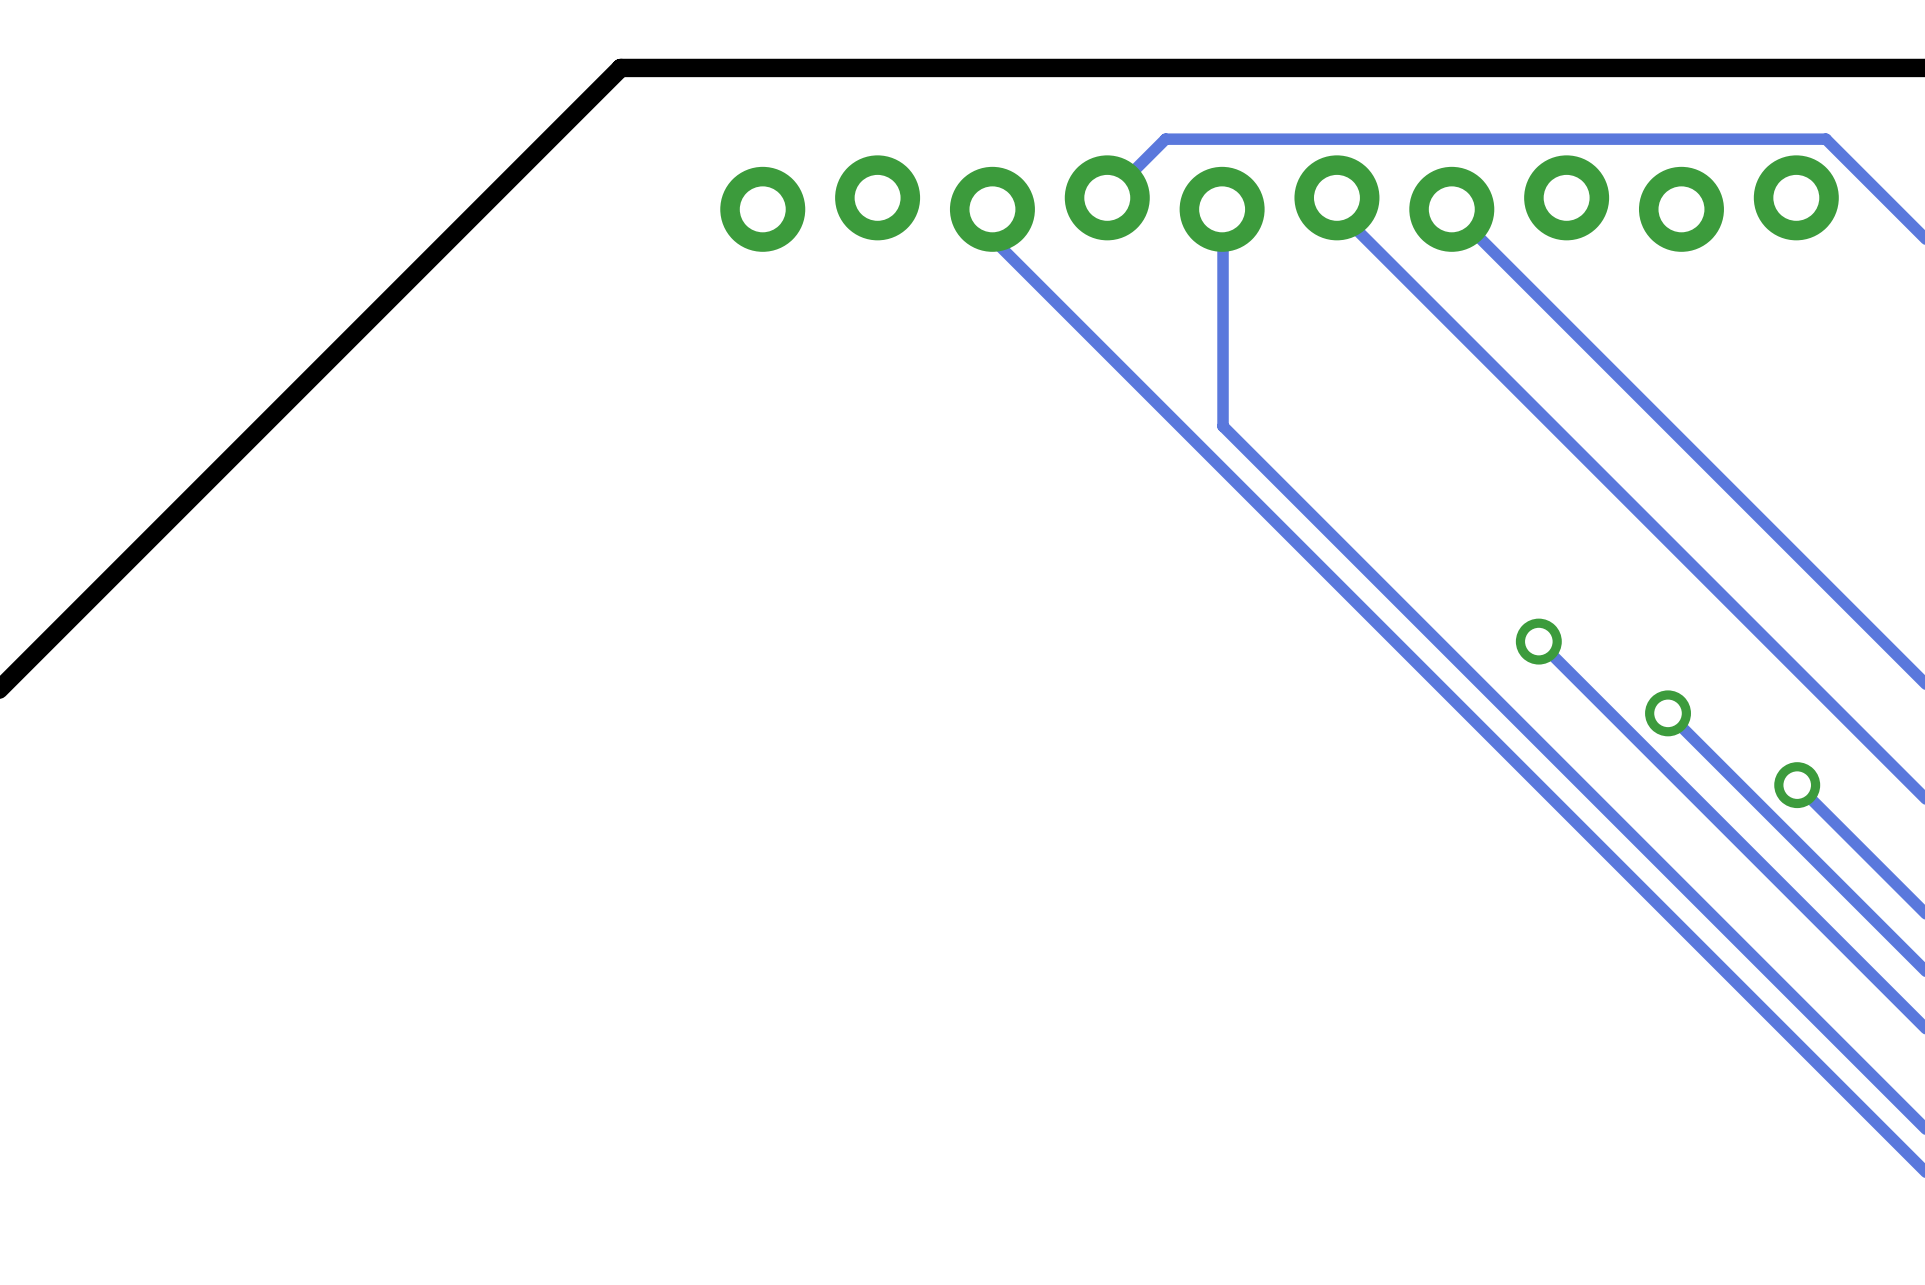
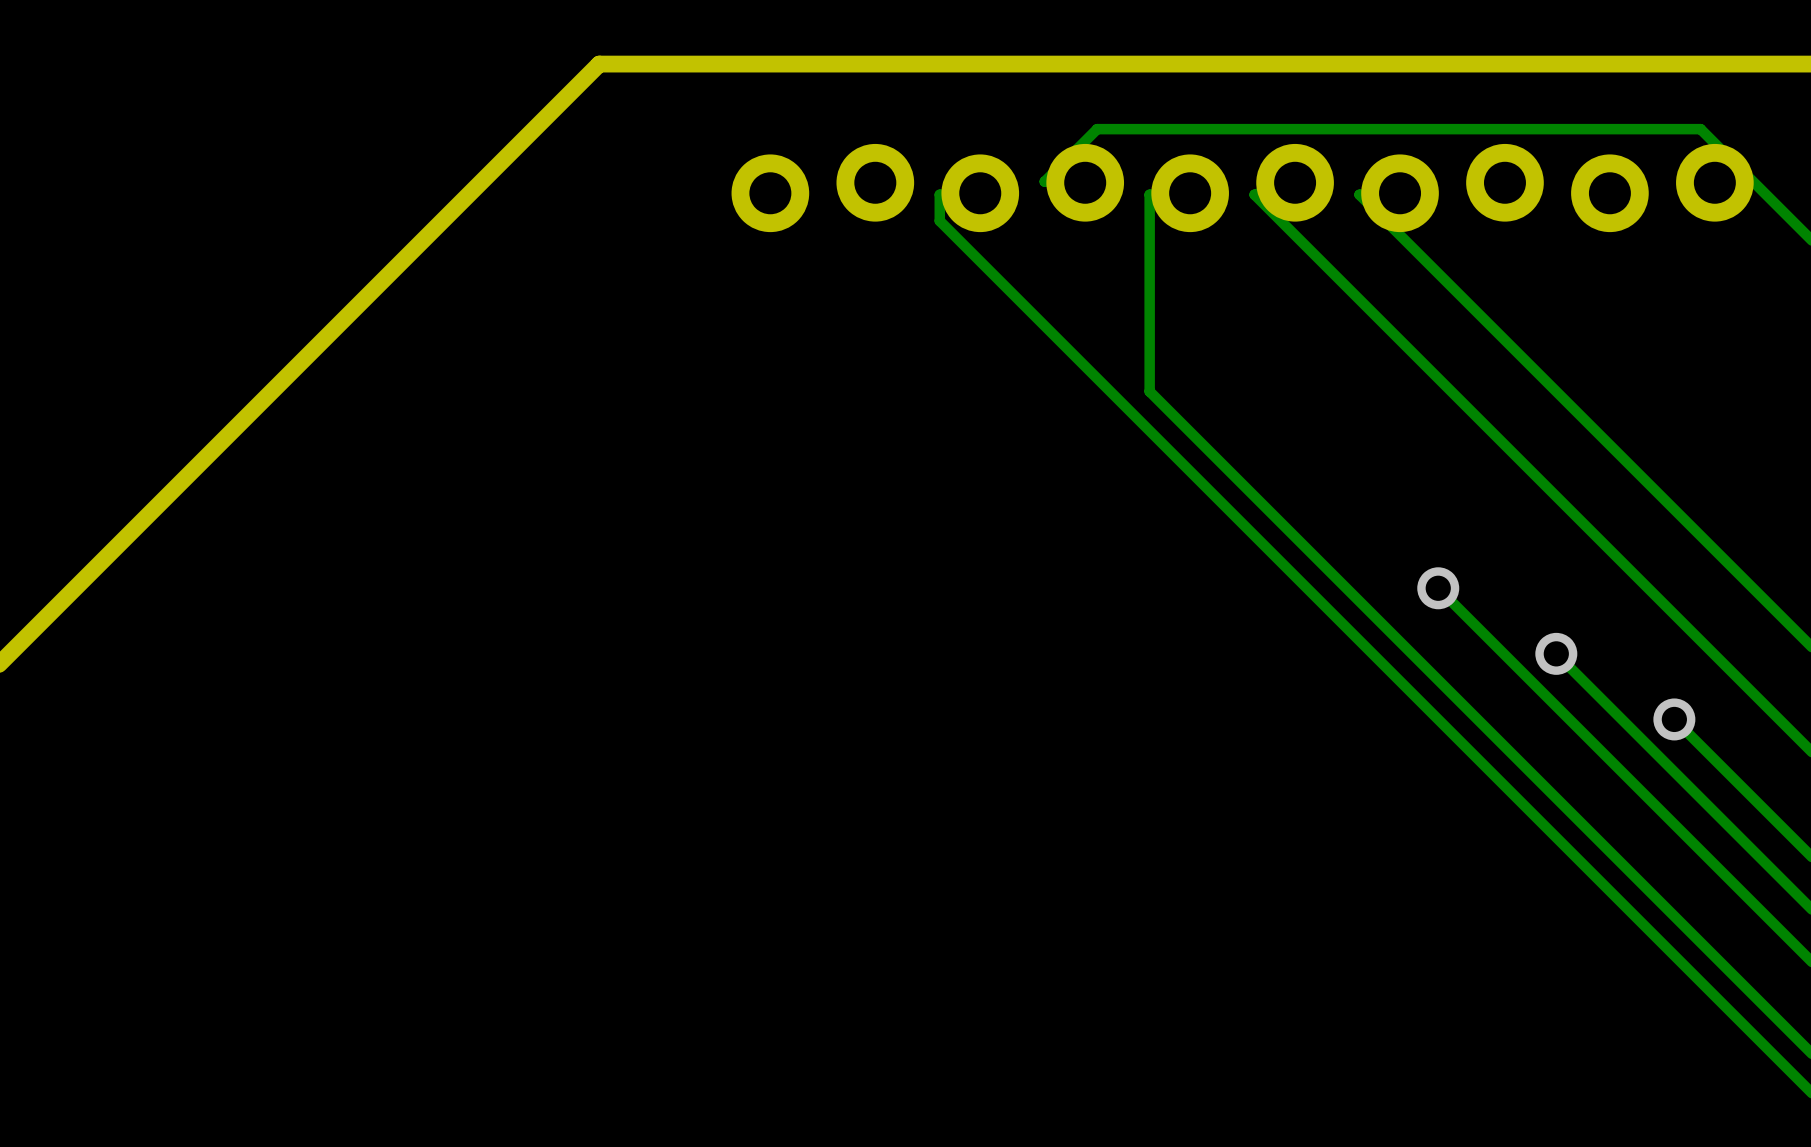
part position: (1279, 203) -> (1242, 188)

